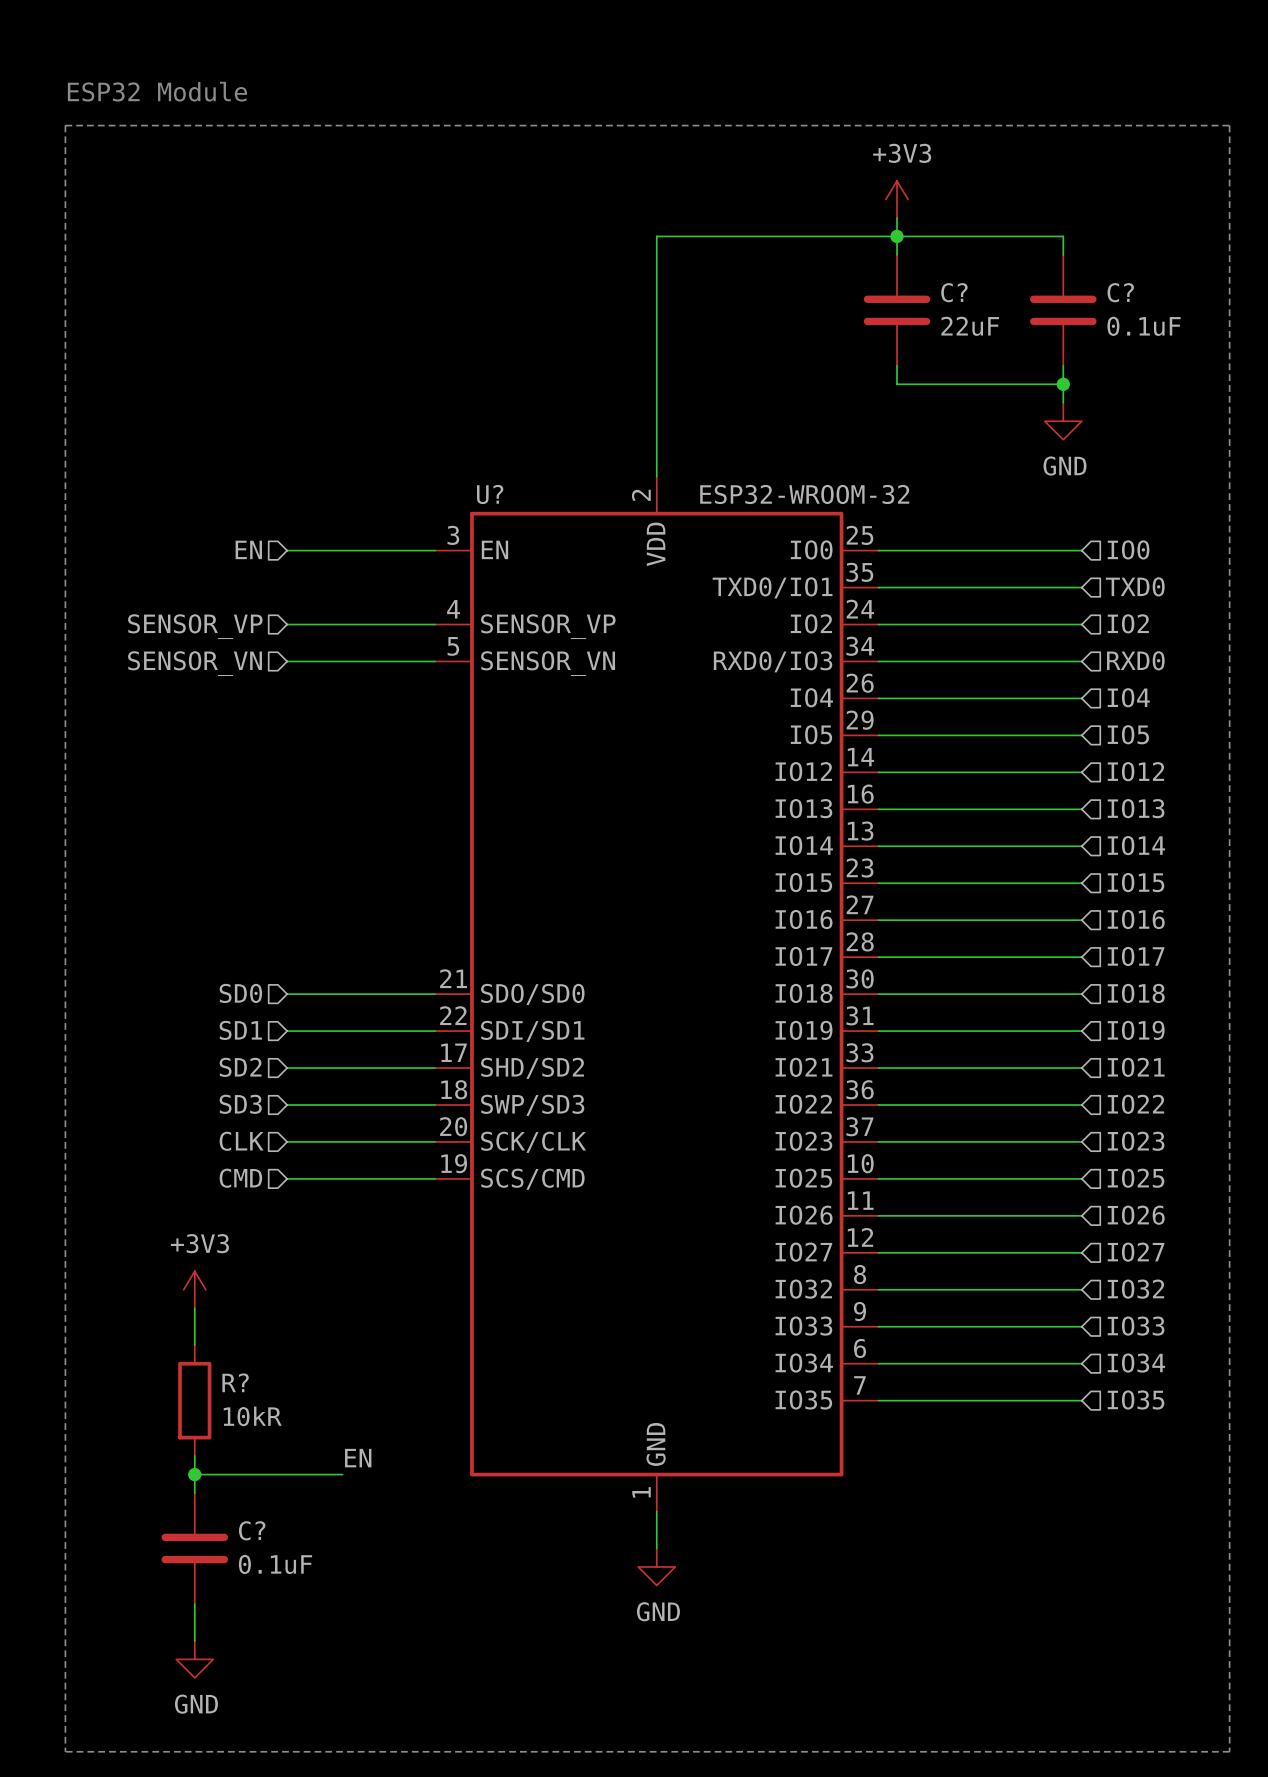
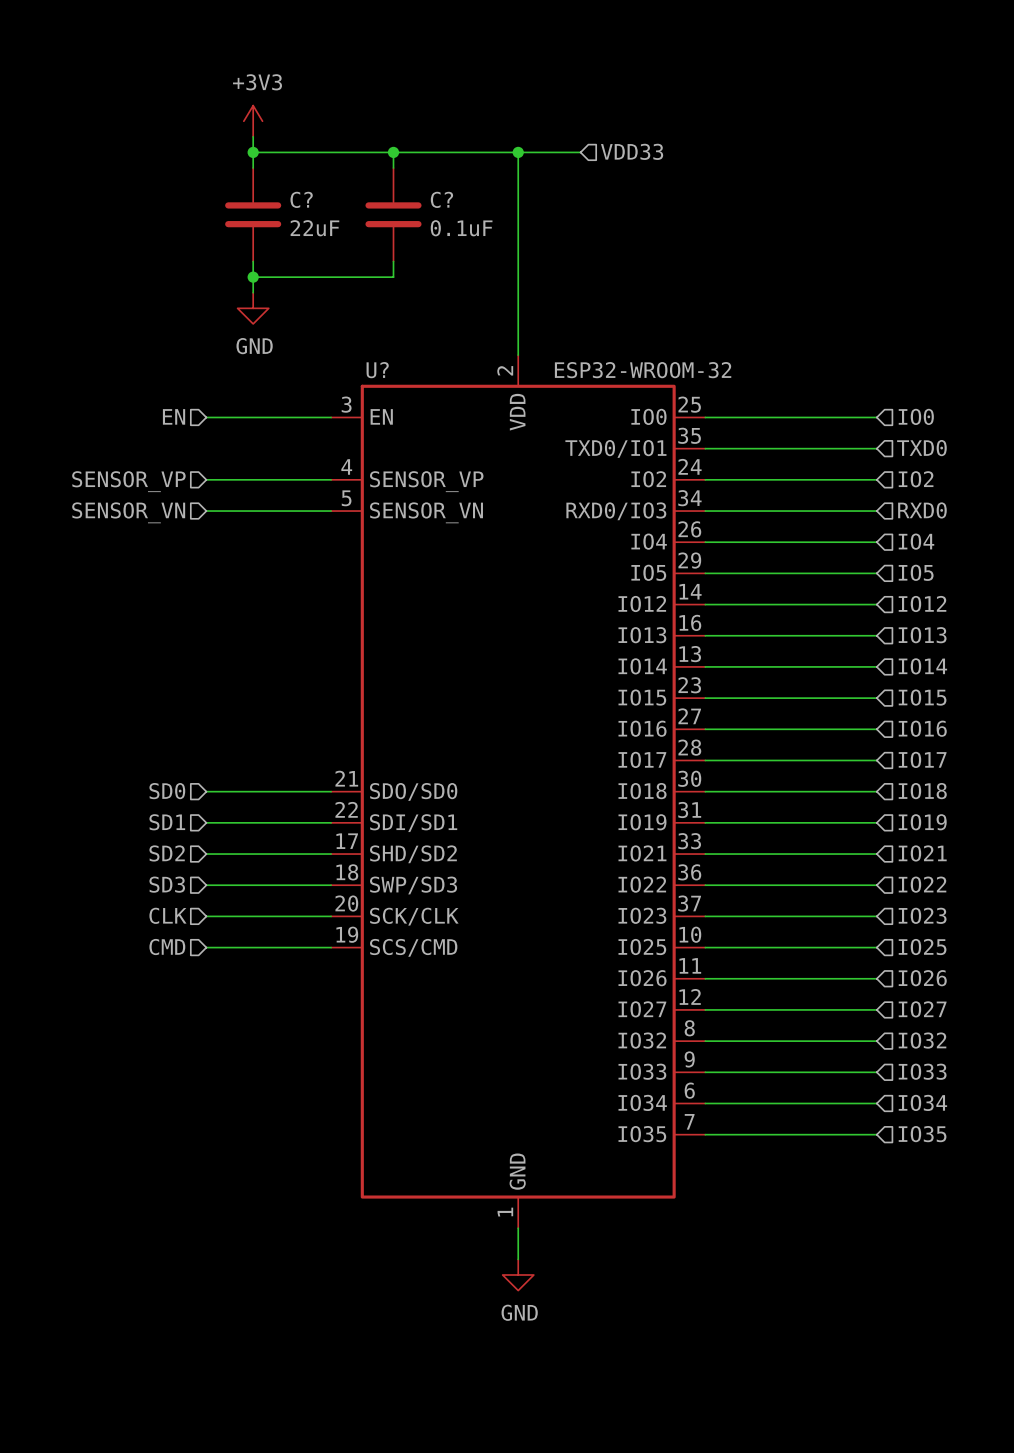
text: ESP32 Module (157, 91) -> none
line: (65, 125) (1229, 125) (1229, 1751) (65, 1751) (65, 125) -> none
power symbol: none -> +3V3 (253, 121)
power symbol: +3V3 (896, 199) -> none
wire: none -> (253, 136) (253, 168)
wire: (896, 217) (896, 254) -> none
hierarchical label: none -> VDD33 (632, 151)
wire: none -> (253, 152) (518, 152)
junction: none -> (253, 152)
wire: none -> (393, 152) (393, 168)
junction: none -> (393, 152)
junction: none -> (518, 152)
wire: (730, 236) (1063, 236) (1063, 254) -> none
junction: (896, 236) -> none
C?: none -> 22uF (253, 214)
C?: none -> 0.1uF (393, 214)
C?: 22uF (896, 310) -> none
C?: 0.1uF (1063, 310) -> none
wire: none -> (253, 261) (253, 292)
wire: none -> (393, 261) (393, 277) (253, 277)
wire: (896, 365) (896, 384) (1063, 384) -> none
wire: (1063, 365) (1063, 402) -> none
junction: none -> (253, 277)
junction: (1063, 384) -> none
power symbol: none -> GND (253, 308)
power symbol: GND (1063, 421) -> none
power symbol: +3V3 (194, 1289) -> none
wire: (194, 1308) (194, 1345) -> none
R?: 10kR (194, 1400) -> none
wire: (194, 1456) (194, 1493) -> none
label: EN (358, 1458) -> none
wire: (194, 1474) (342, 1474) -> none
junction: (194, 1474) -> none
C?: 0.1uF (194, 1548) -> none
wire: (194, 1603) (194, 1640) -> none
power symbol: GND (194, 1659) -> none

